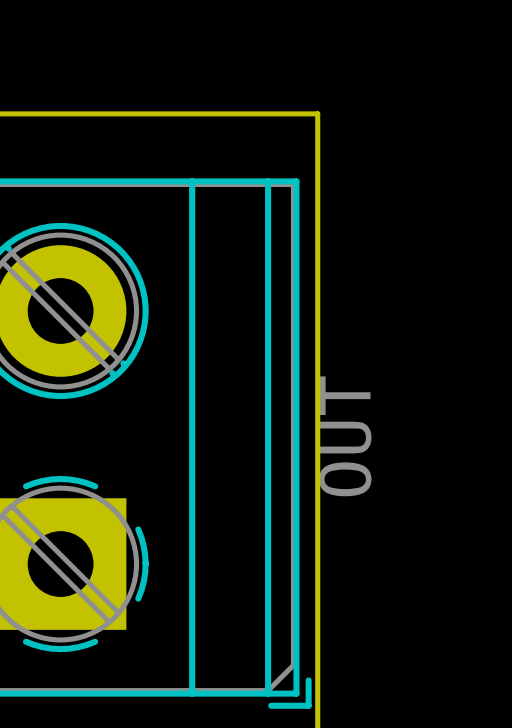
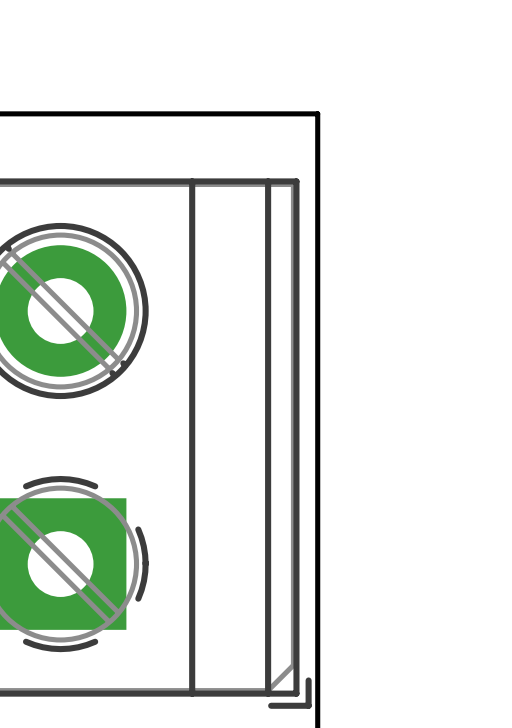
part value: OUT (345, 436) -> none

